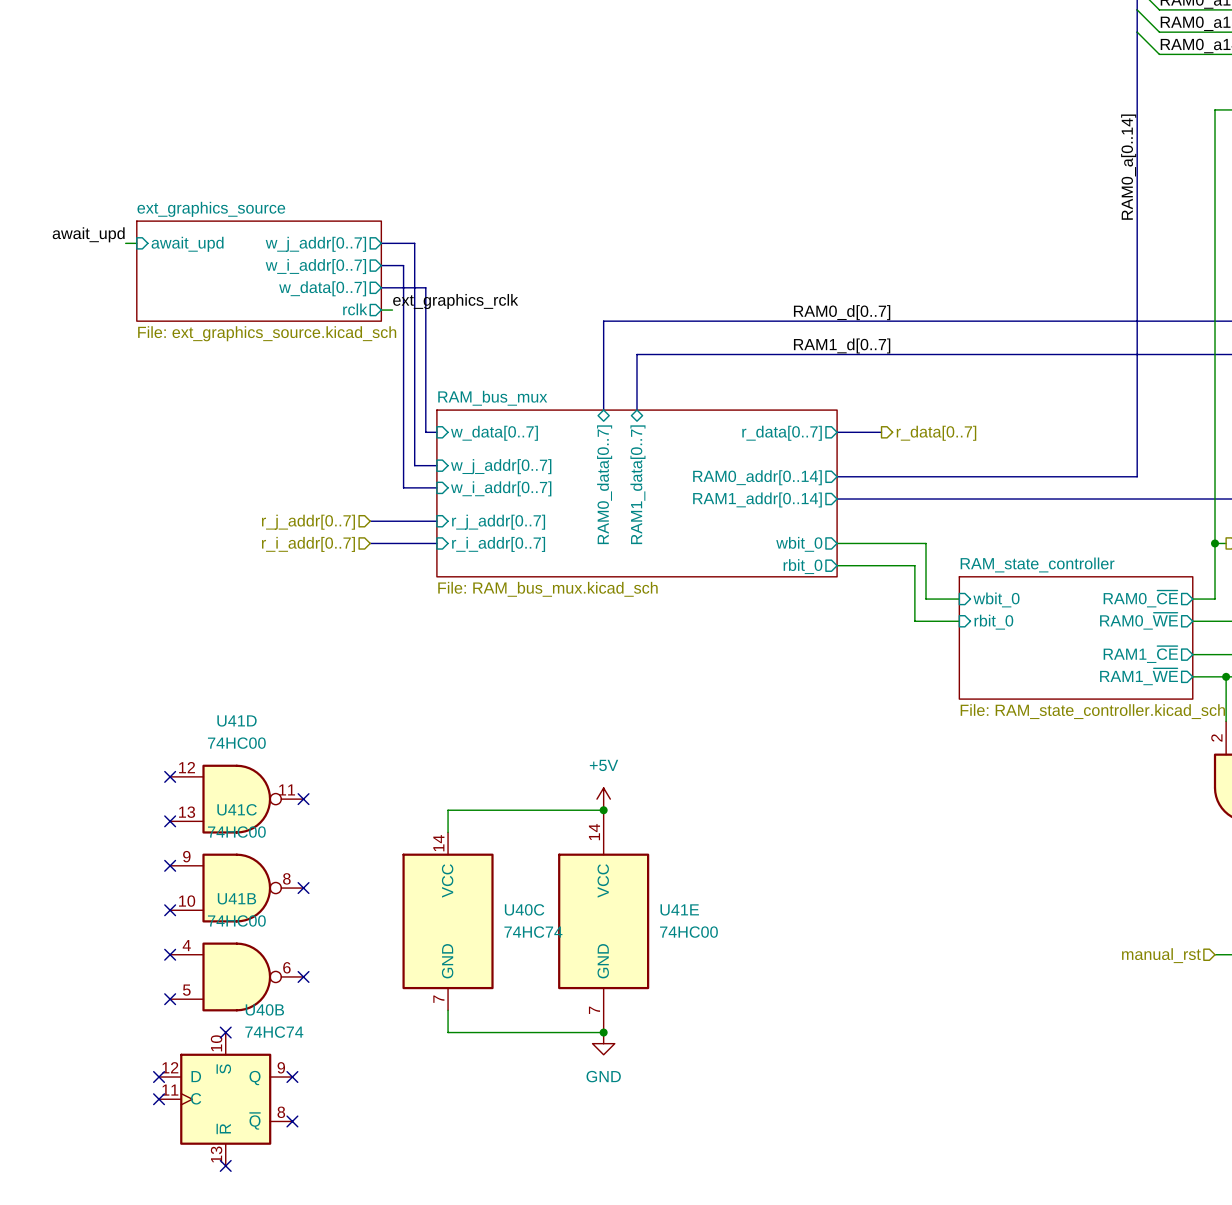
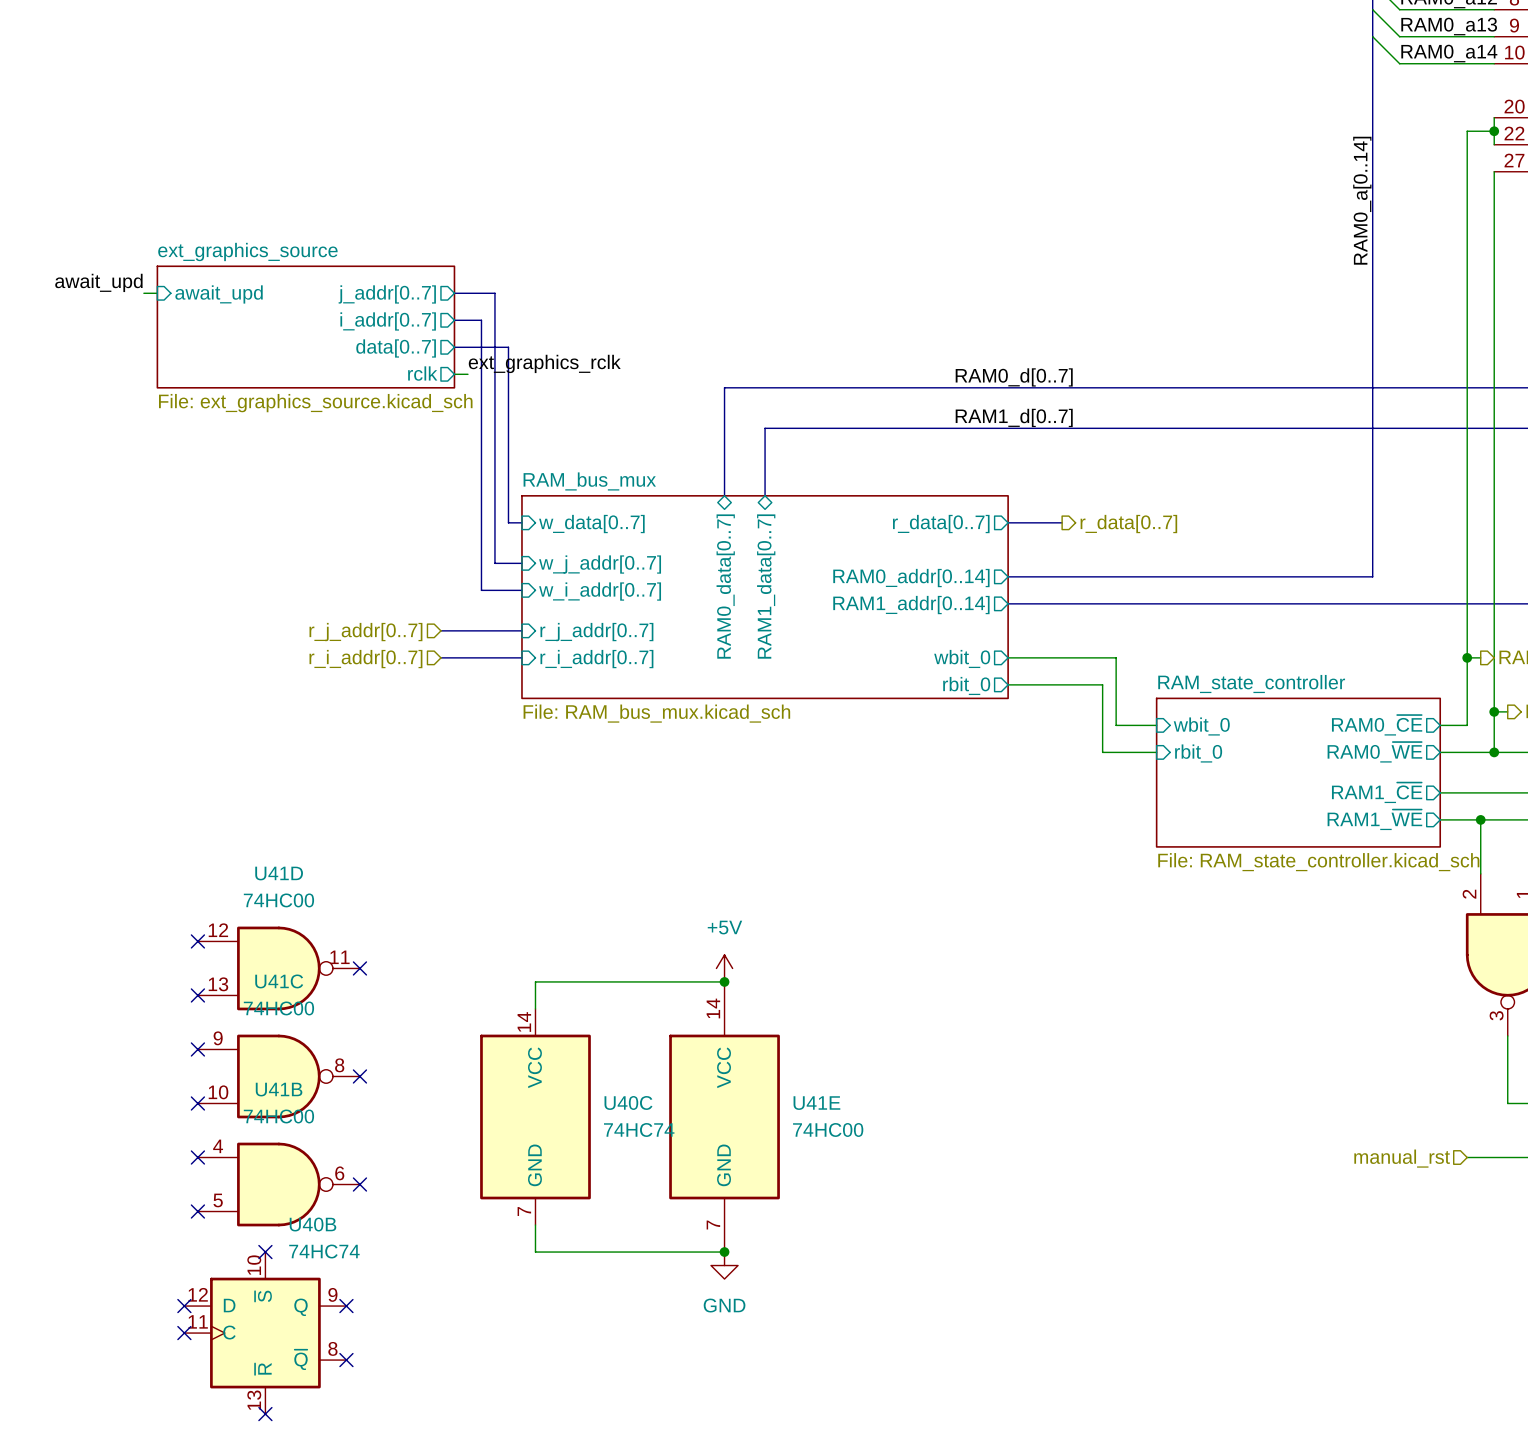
sheet pin: w_j_addr[0..7] (315, 244) -> j_addr[0..7] (387, 294)
sheet pin: w_i_addr[0..7] (315, 266) -> i_addr[0..7] (388, 321)
sheet pin: w_data[0..7] (322, 288) -> data[0..7] (396, 348)

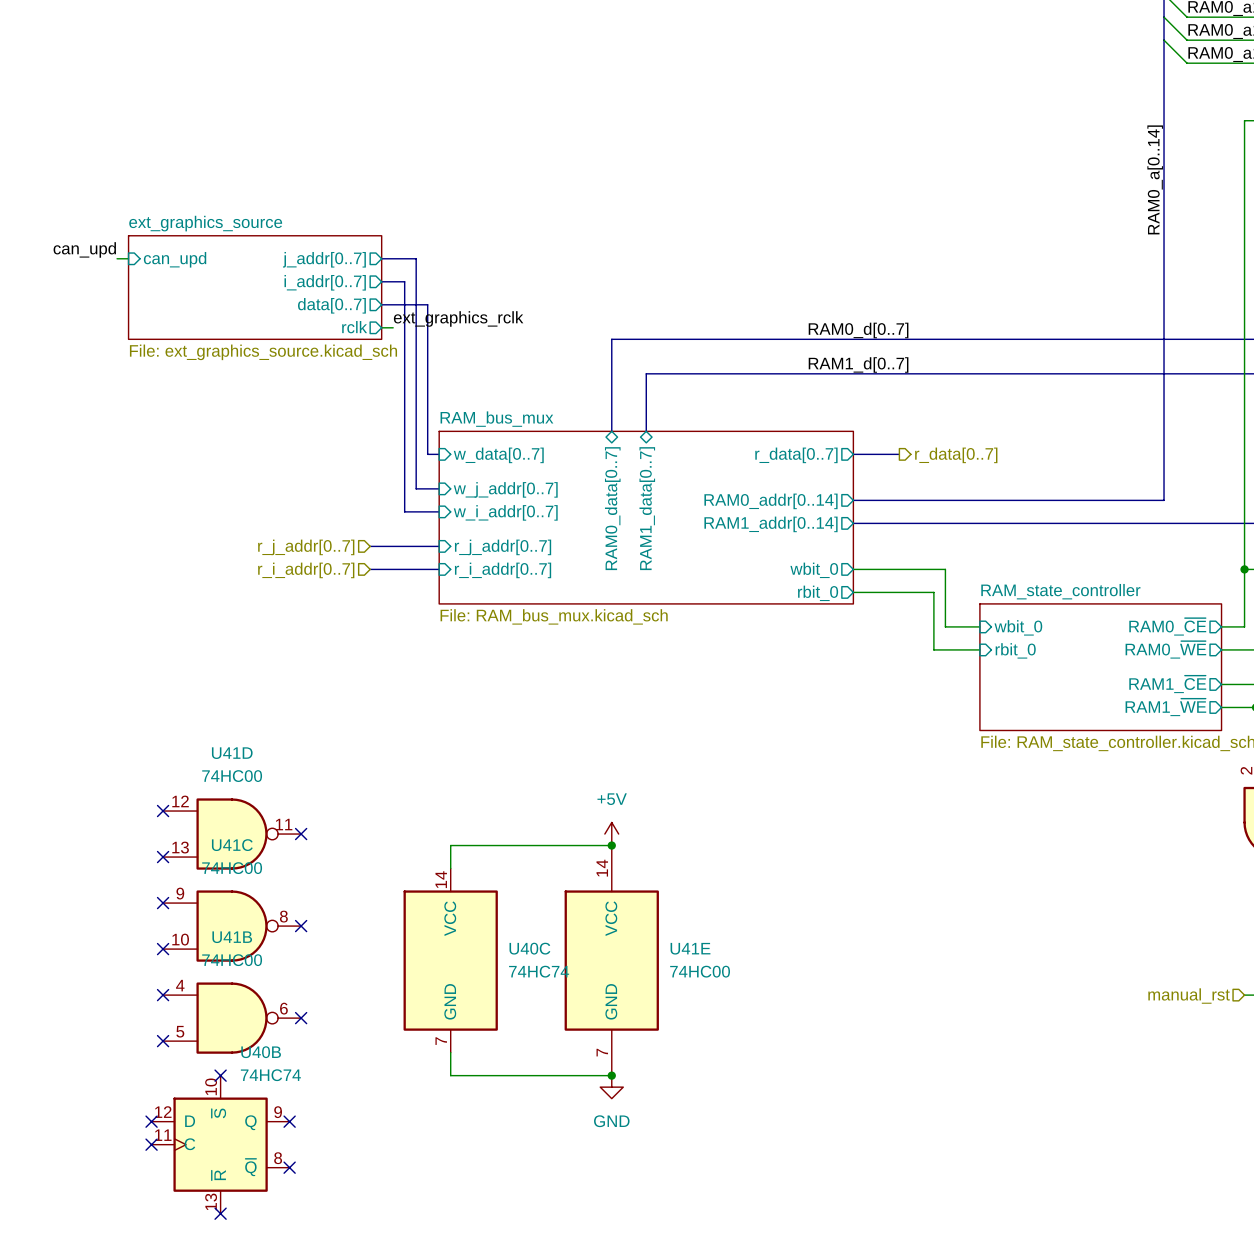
label: await_upd (98, 282) -> can_upd (84, 249)
sheet pin: await_upd (219, 294) -> can_upd (175, 259)

